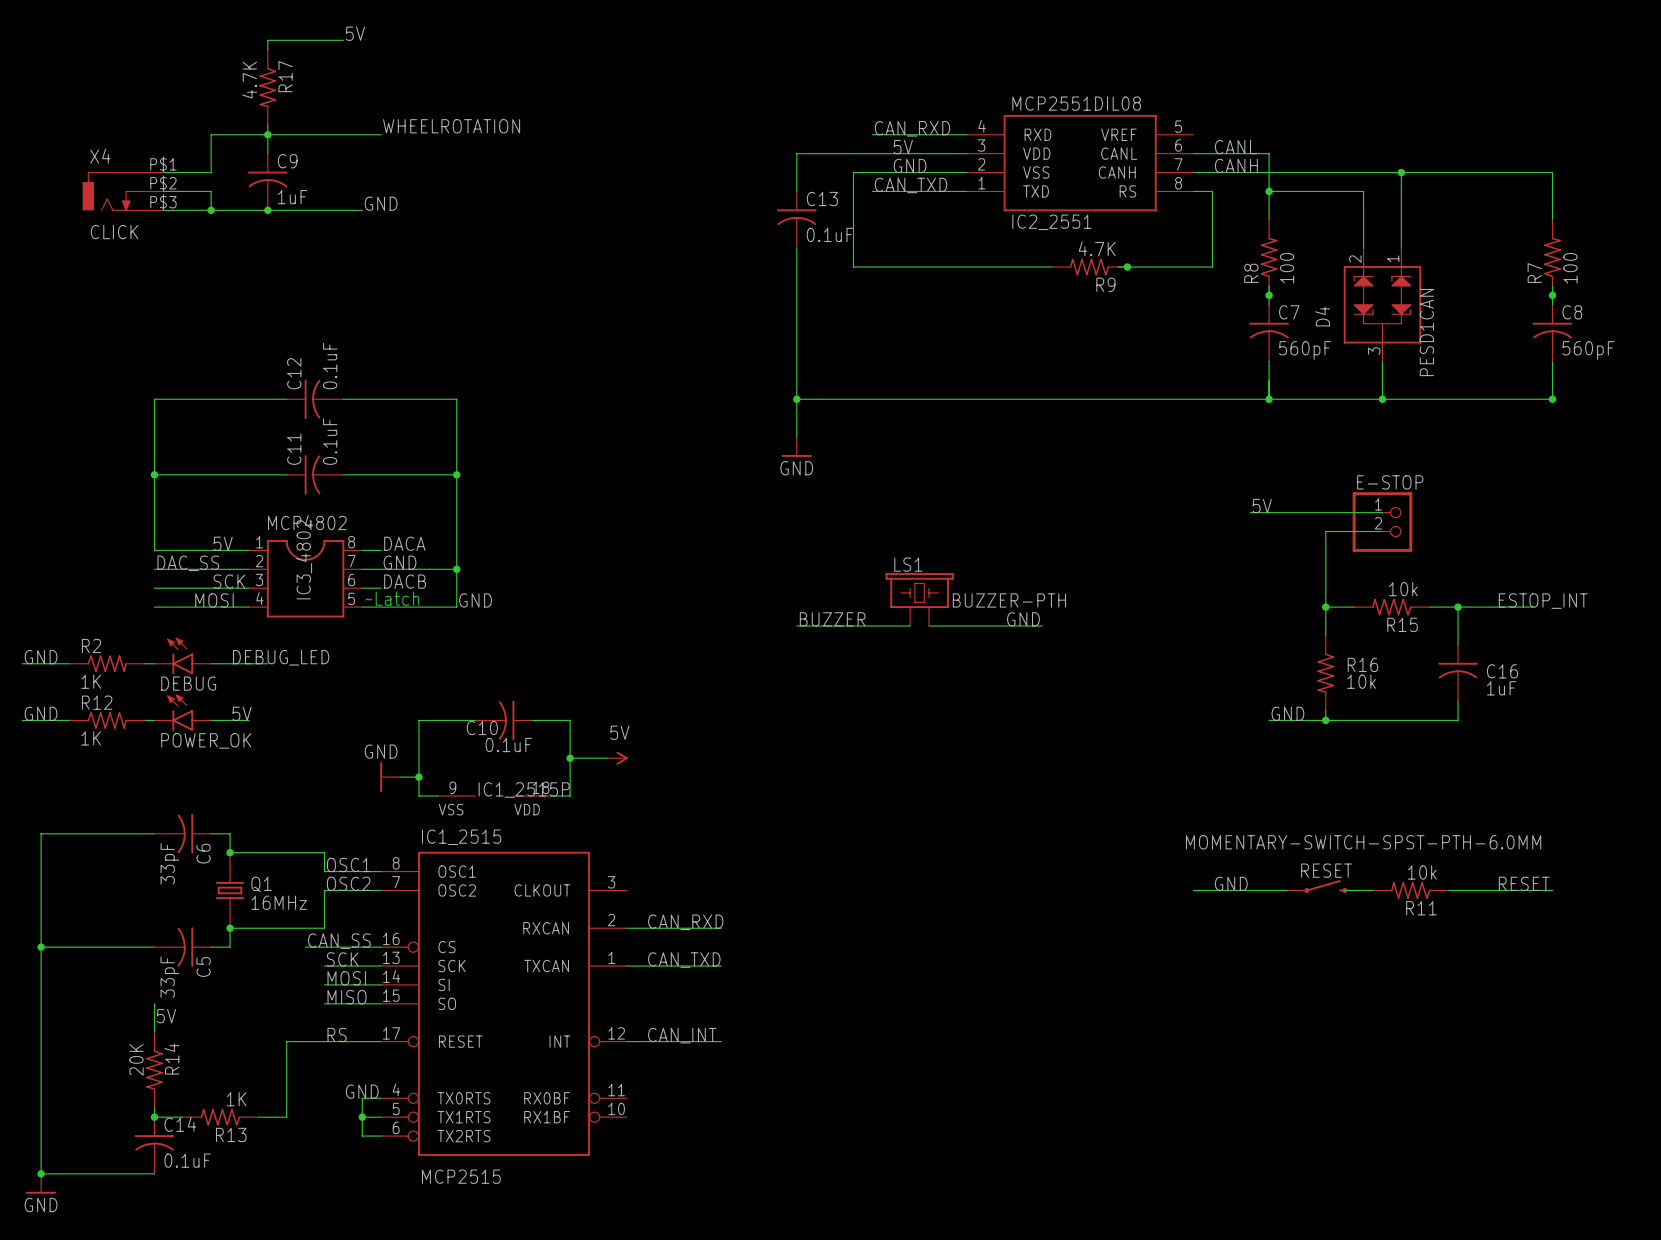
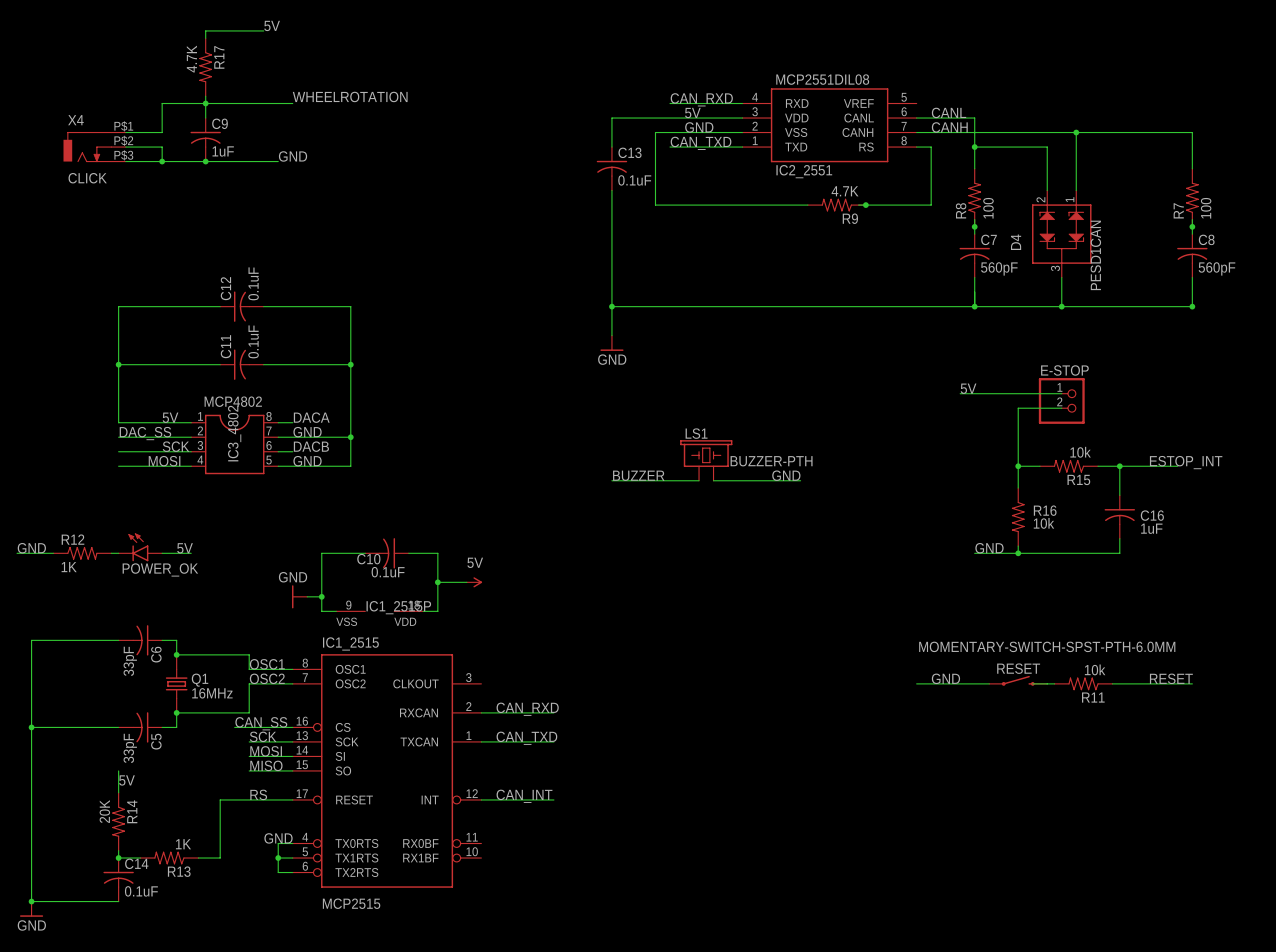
text: ~Latch (392, 598) -> none
label position: GND (475, 600) -> GND (307, 461)
DEBUG: (182, 655) -> none
label: GND (41, 657) -> none
label: DEBUG_LED (281, 657) -> none
wire: (22, 663) (69, 663) -> none
R2: 1K (107, 663) -> none
wire: (145, 663) (154, 663) -> none
wire: (211, 663) (267, 663) -> none

